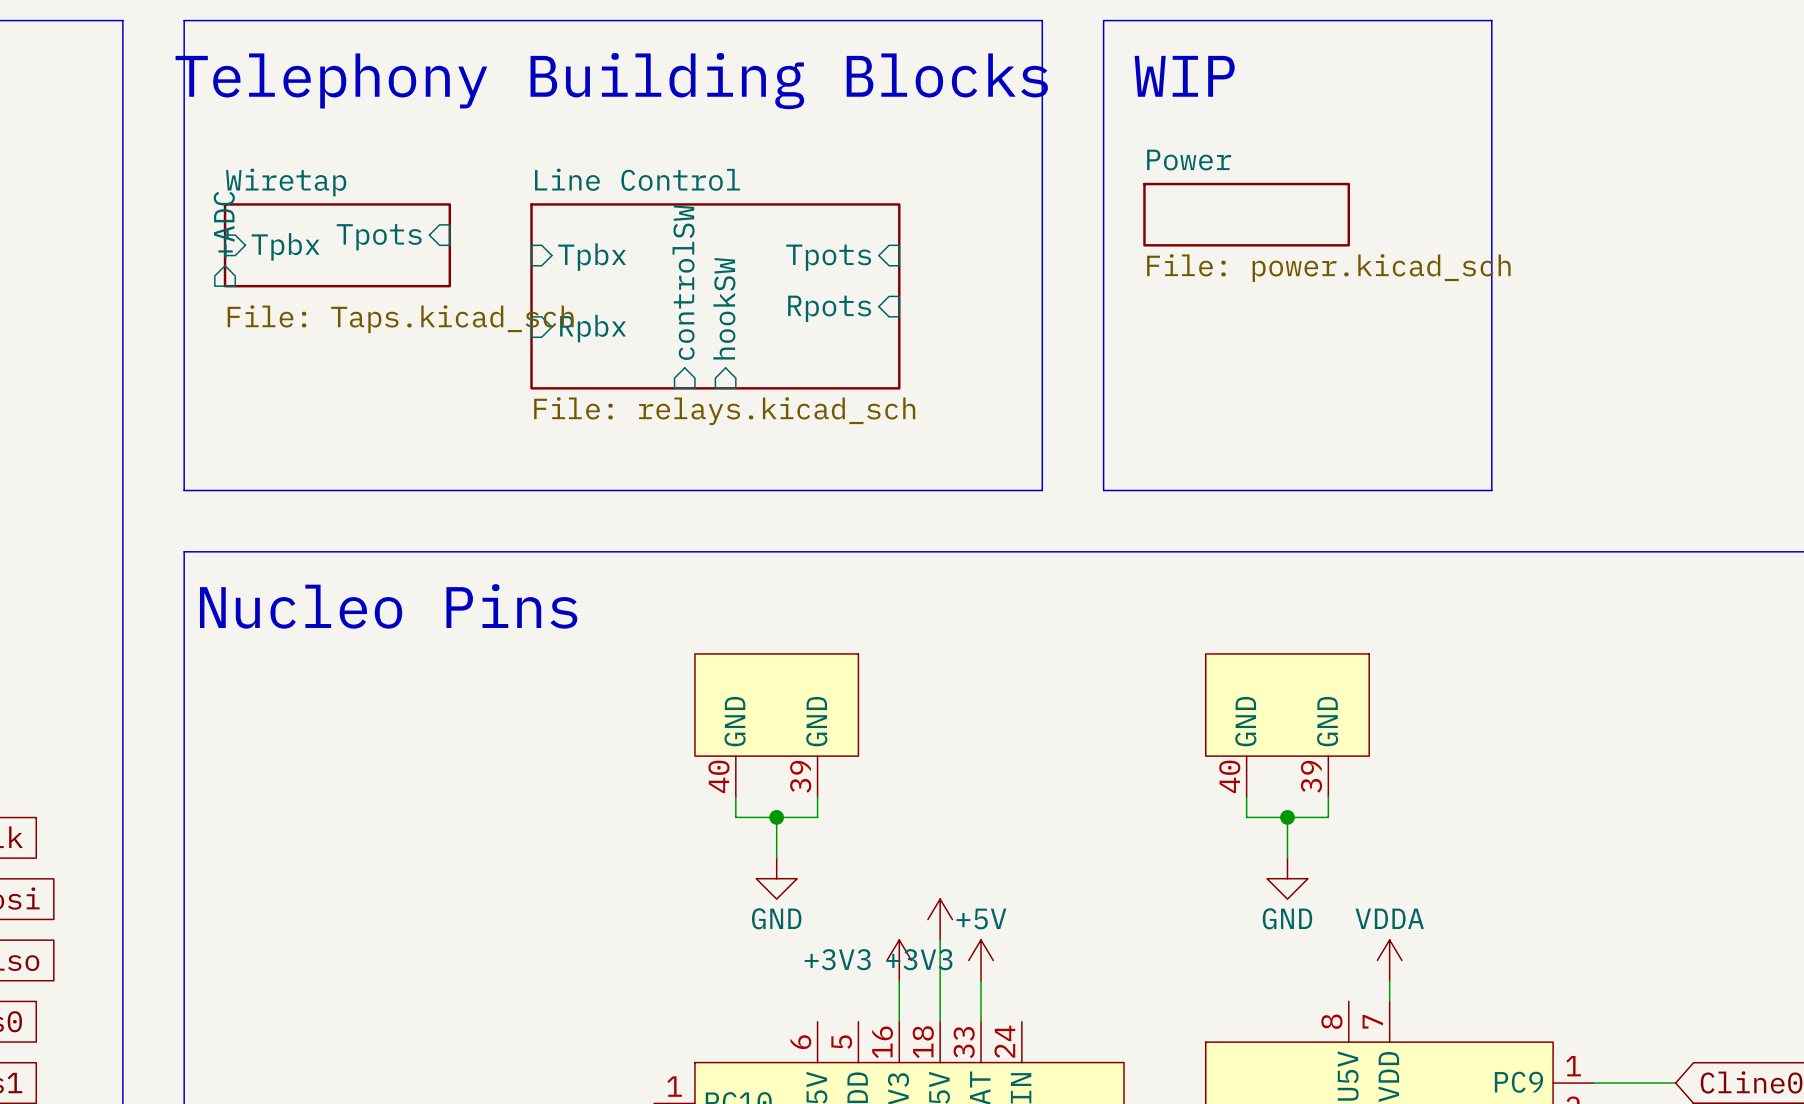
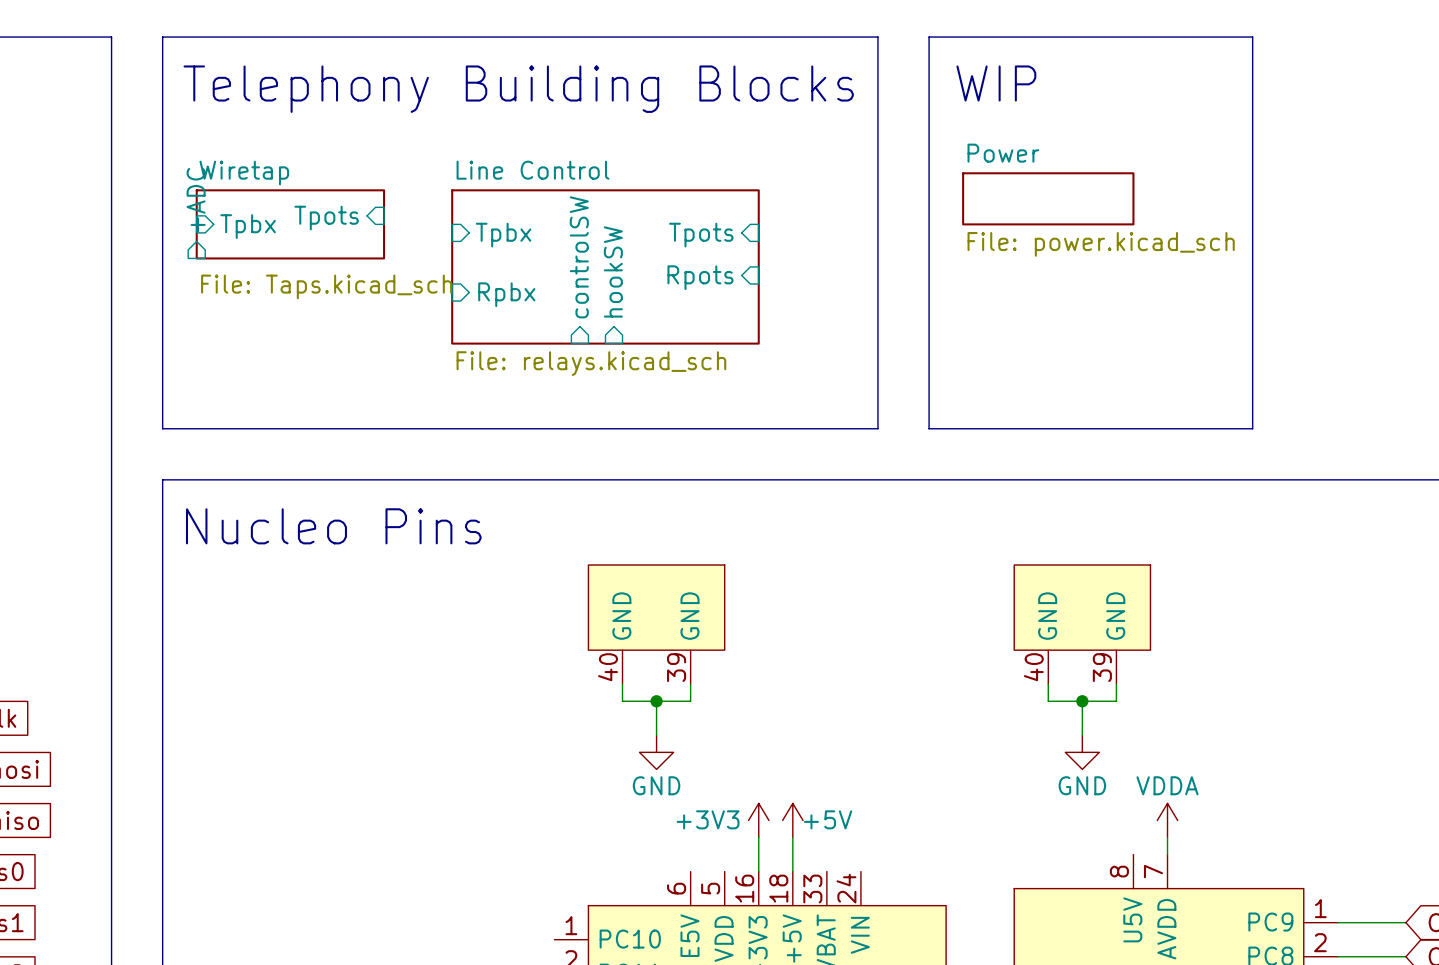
power symbol position: +5V (940, 919) -> +5V (792, 820)
power symbol: +3V3 (981, 960) -> none
wire: (981, 980) (981, 1021) -> none

